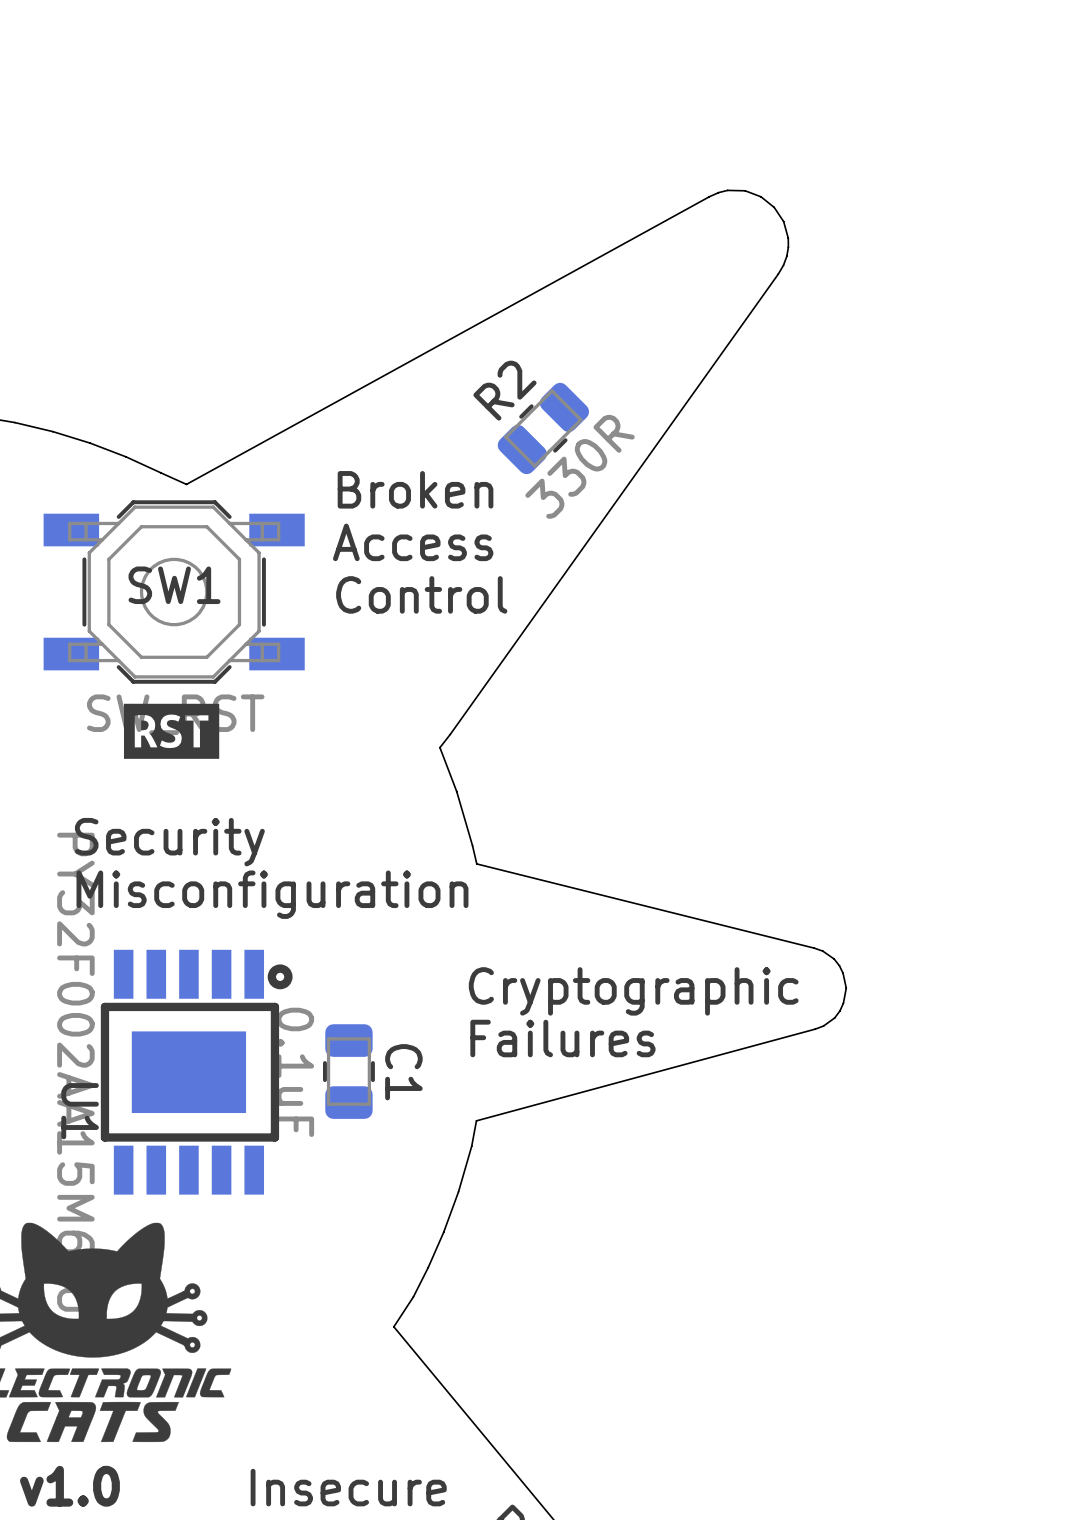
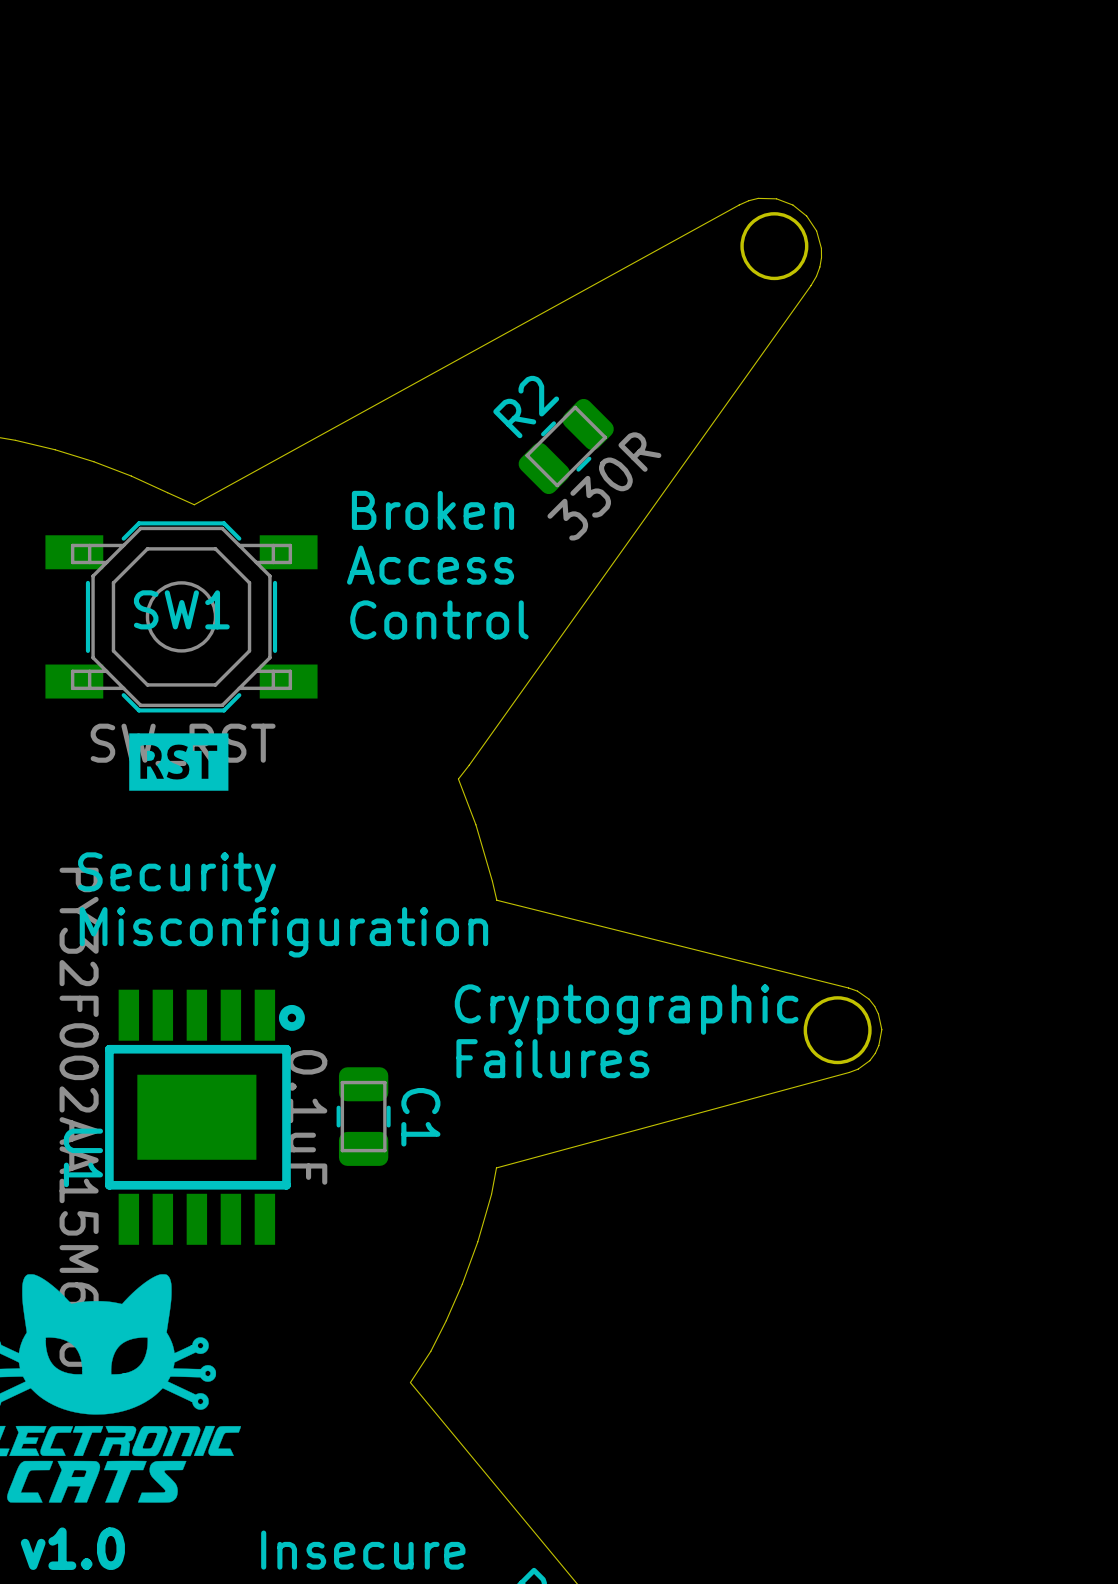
round board edge: none -> [740, 212, 809, 281]
round board edge: none -> [803, 996, 872, 1065]
text position: Cryptographic (633, 991) -> Cryptographic (626, 1009)
text position: Failures (562, 1038) -> Failures (552, 1058)

